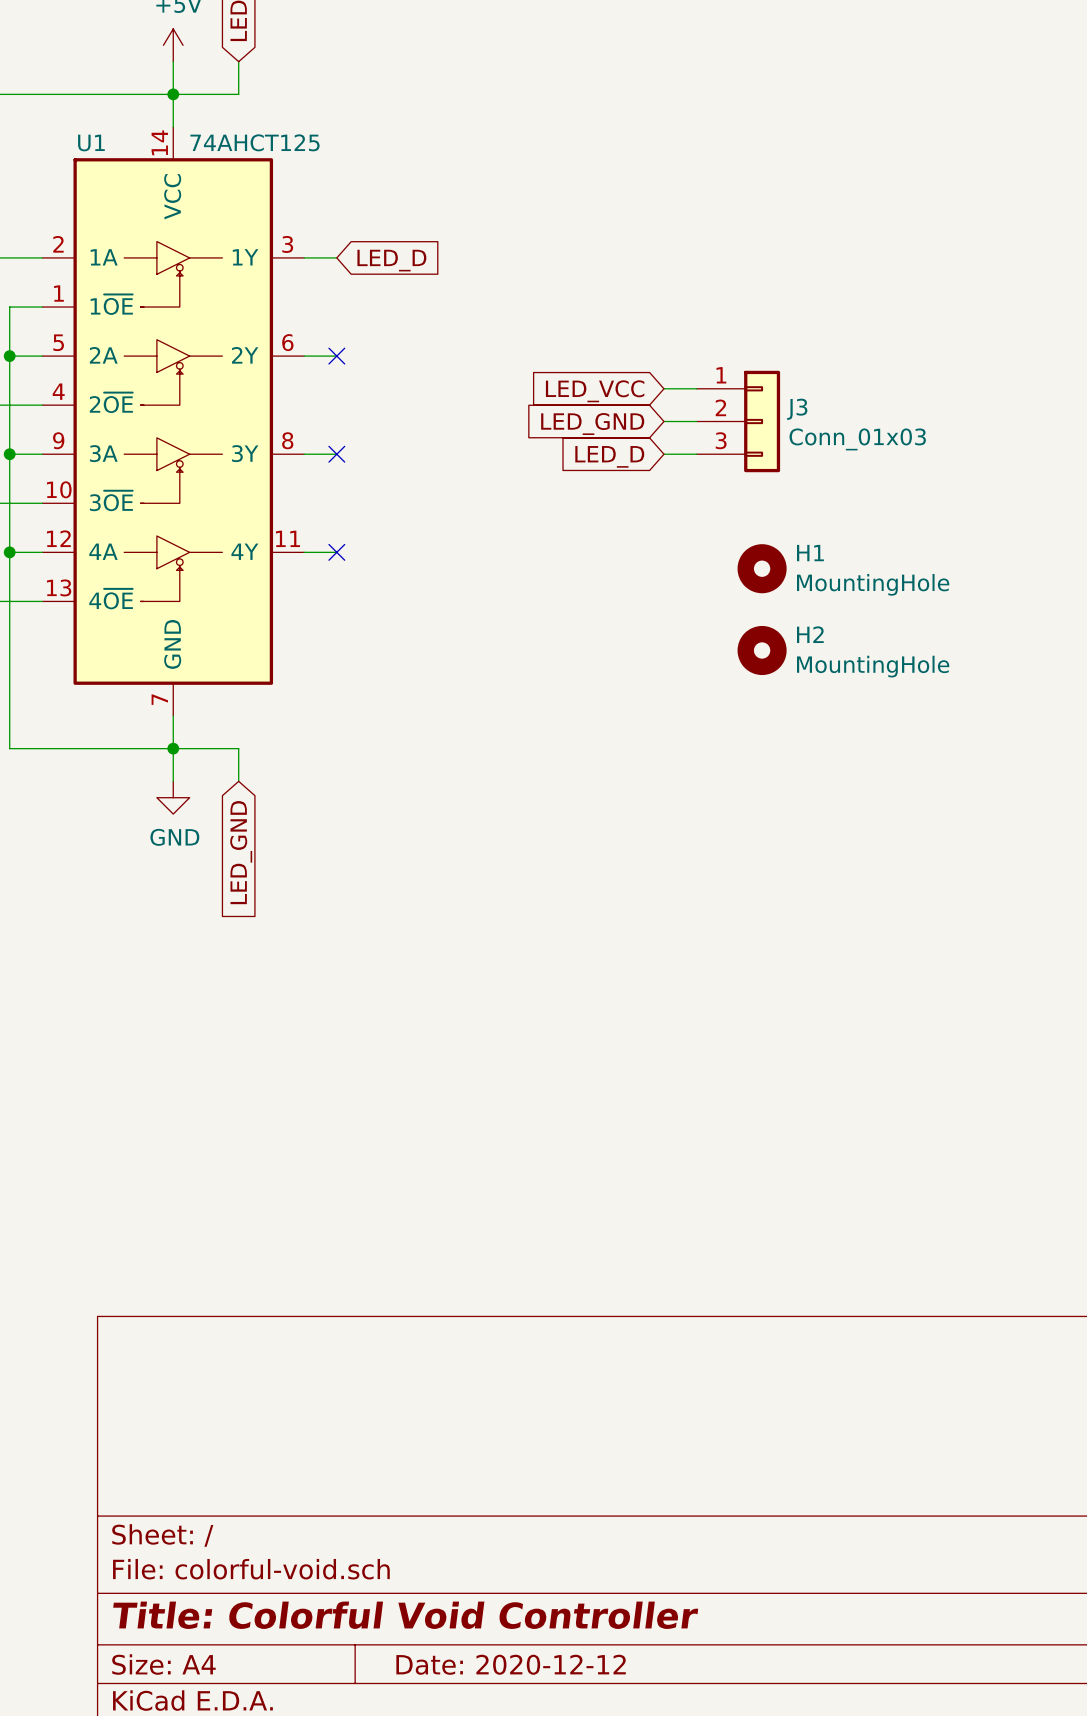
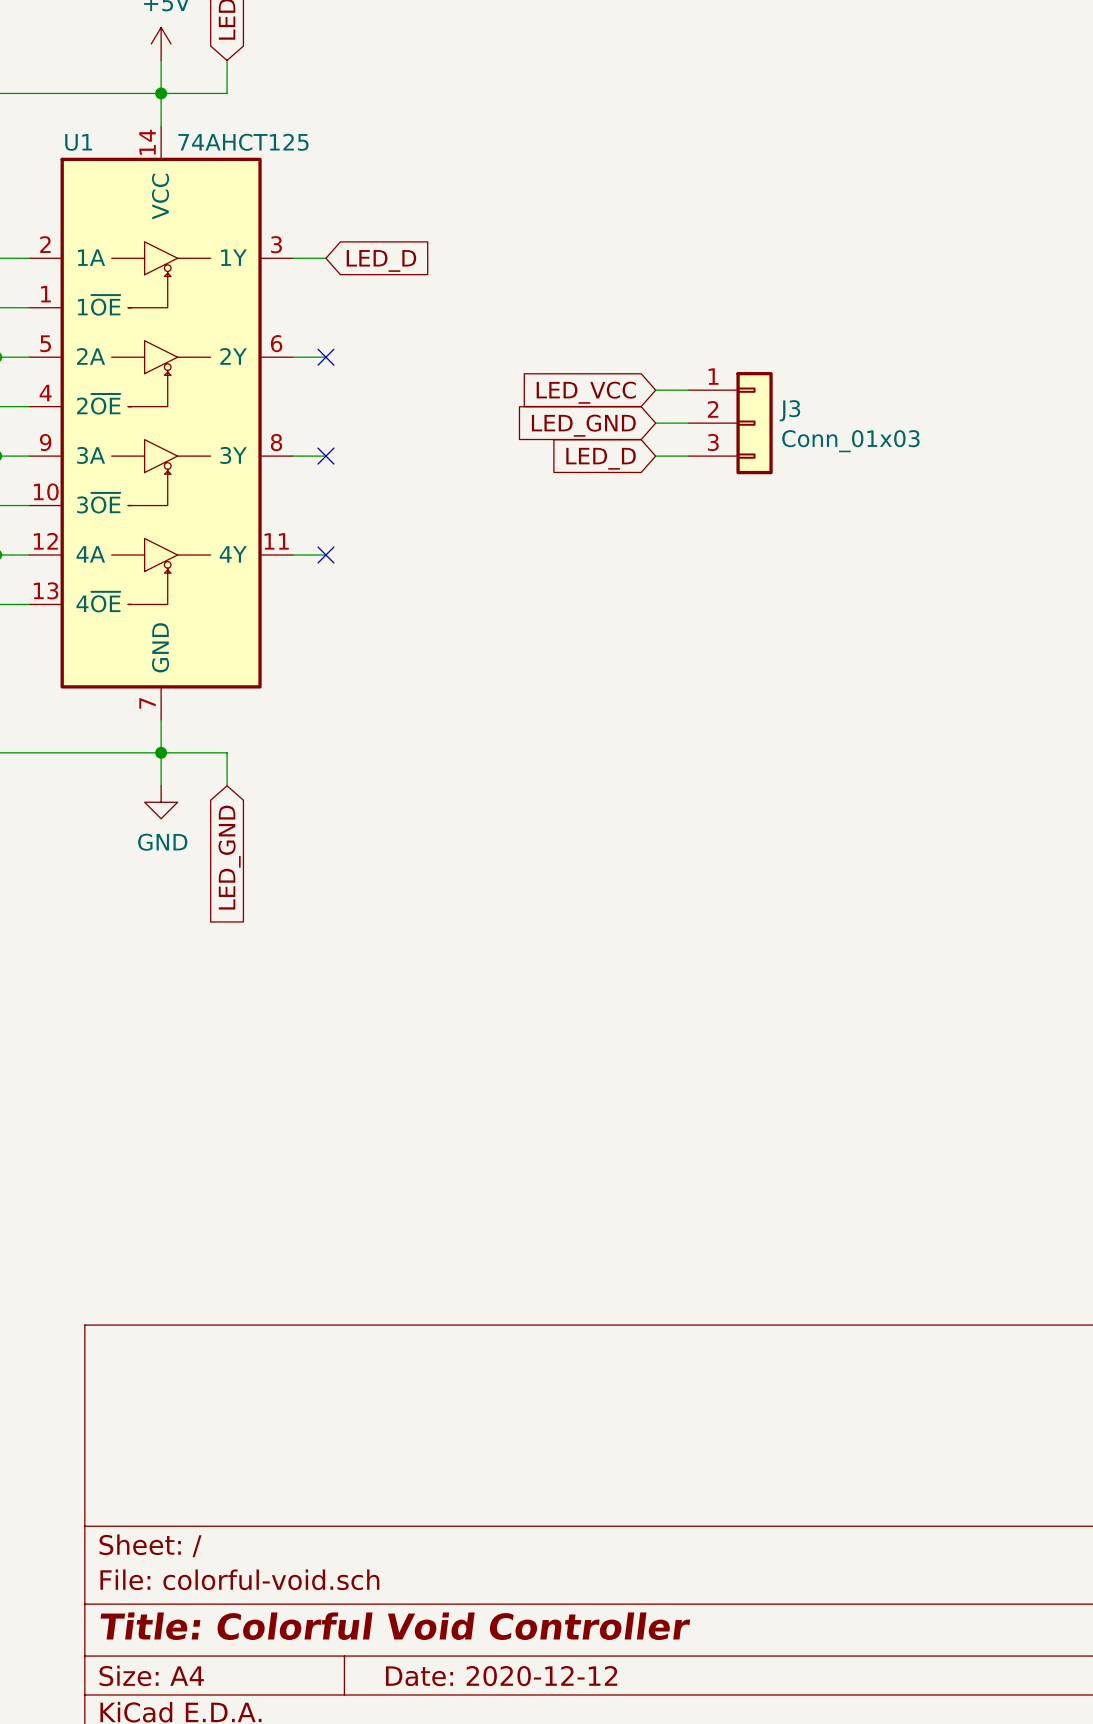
H1: MountingHole (762, 568) -> none
H2: MountingHole (762, 650) -> none

